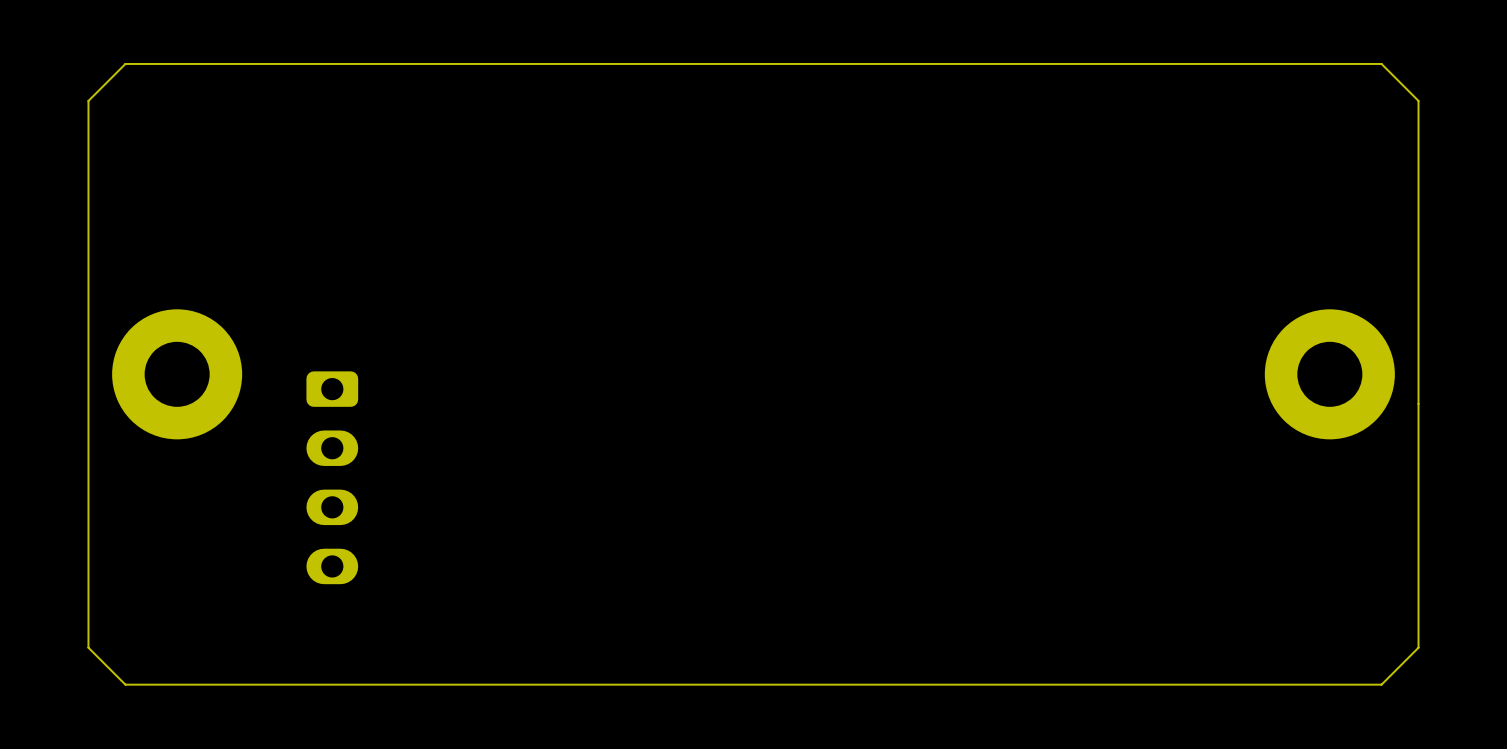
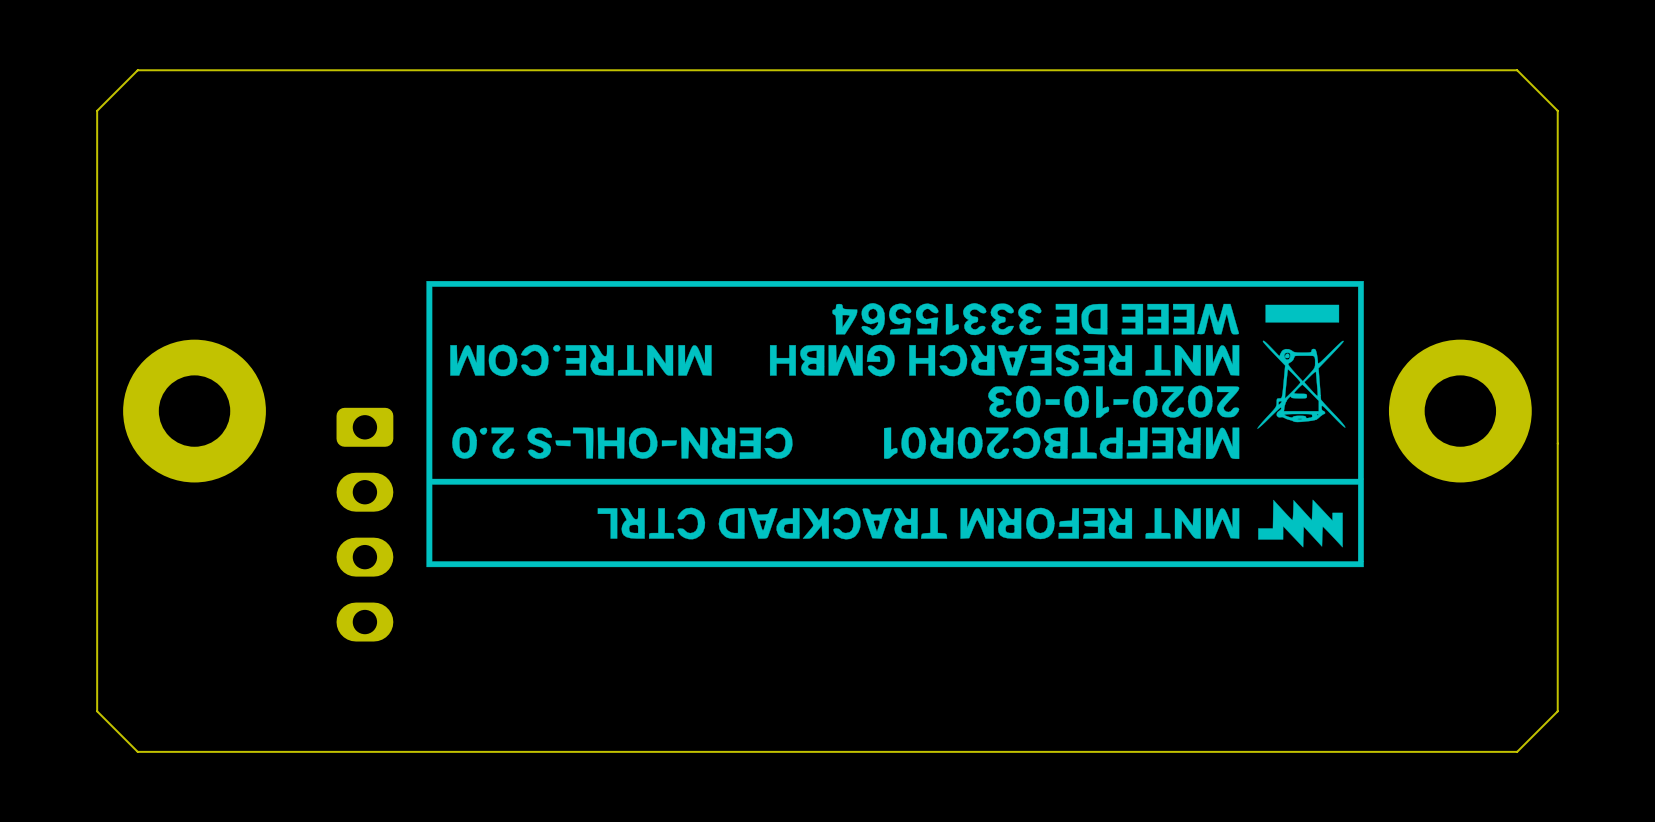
drawing: none -> [426, 280, 1364, 568]

